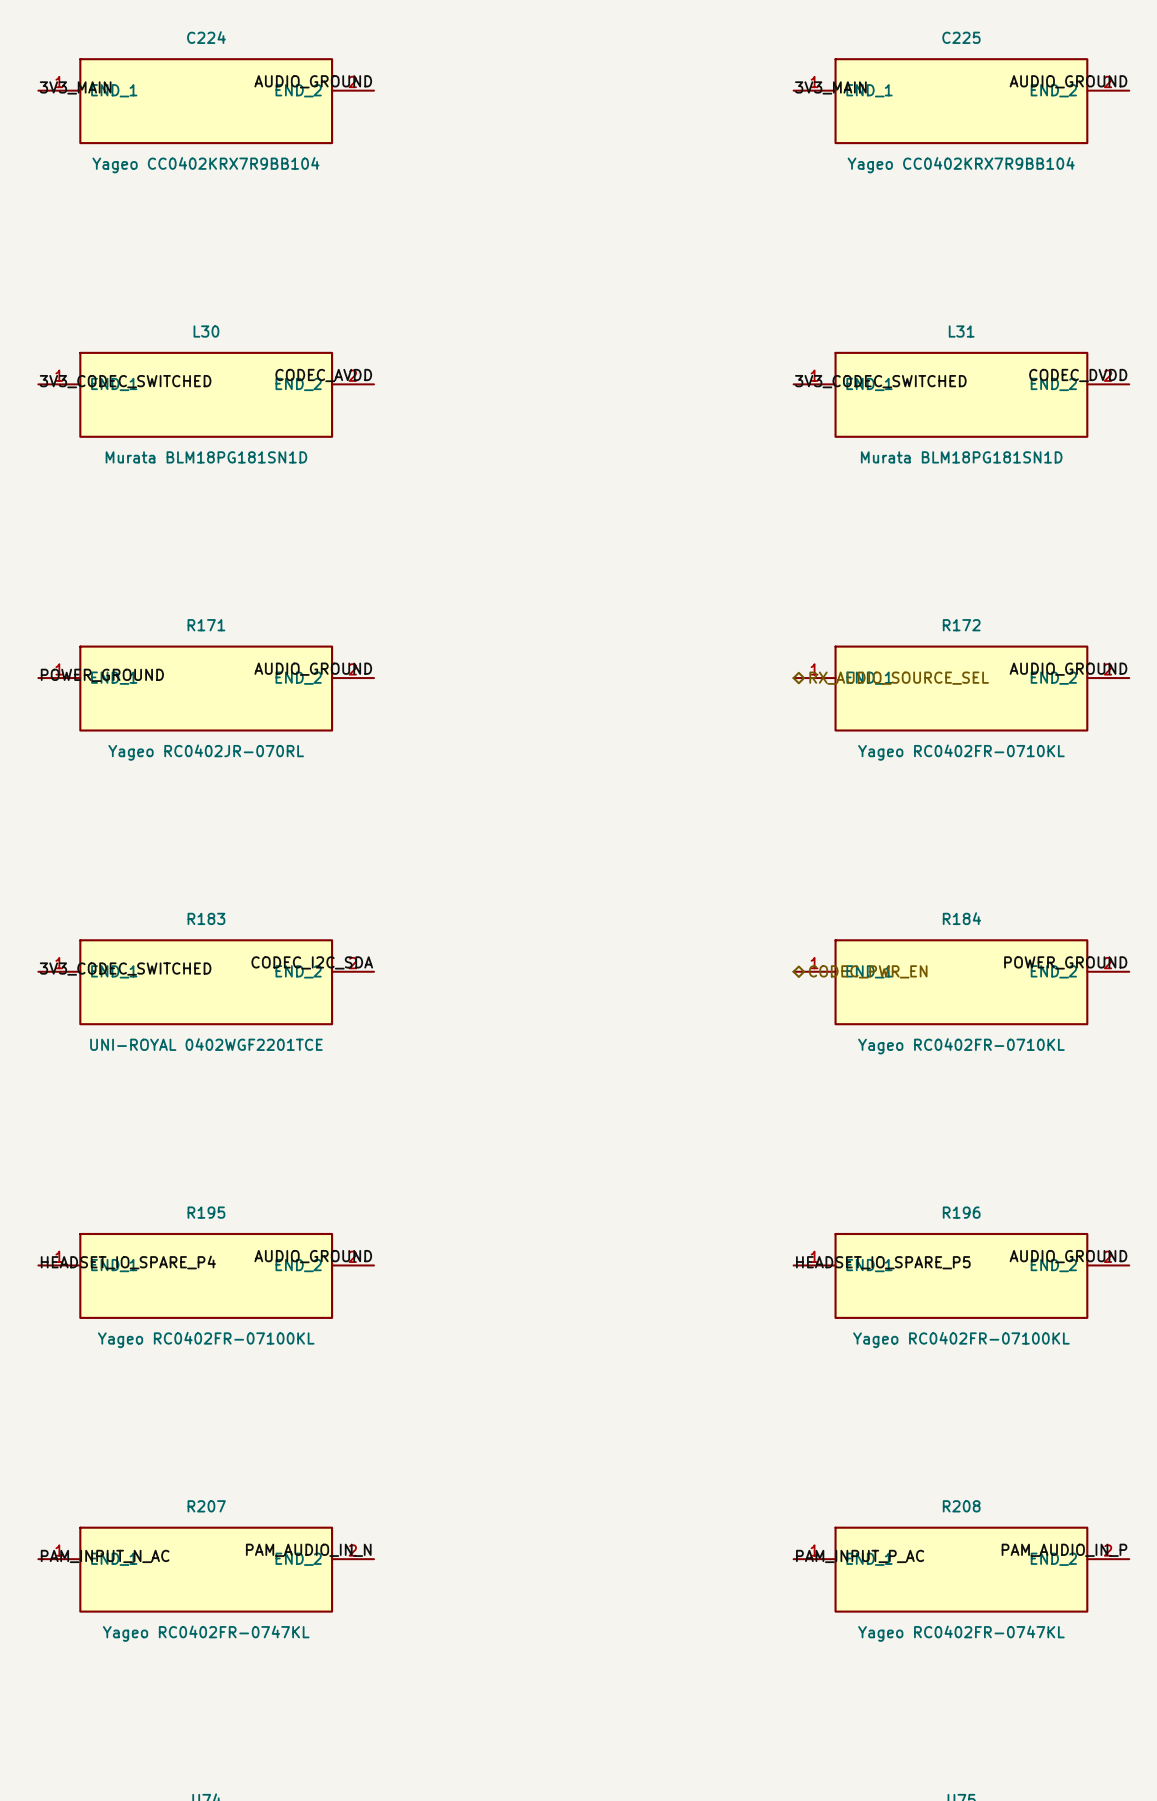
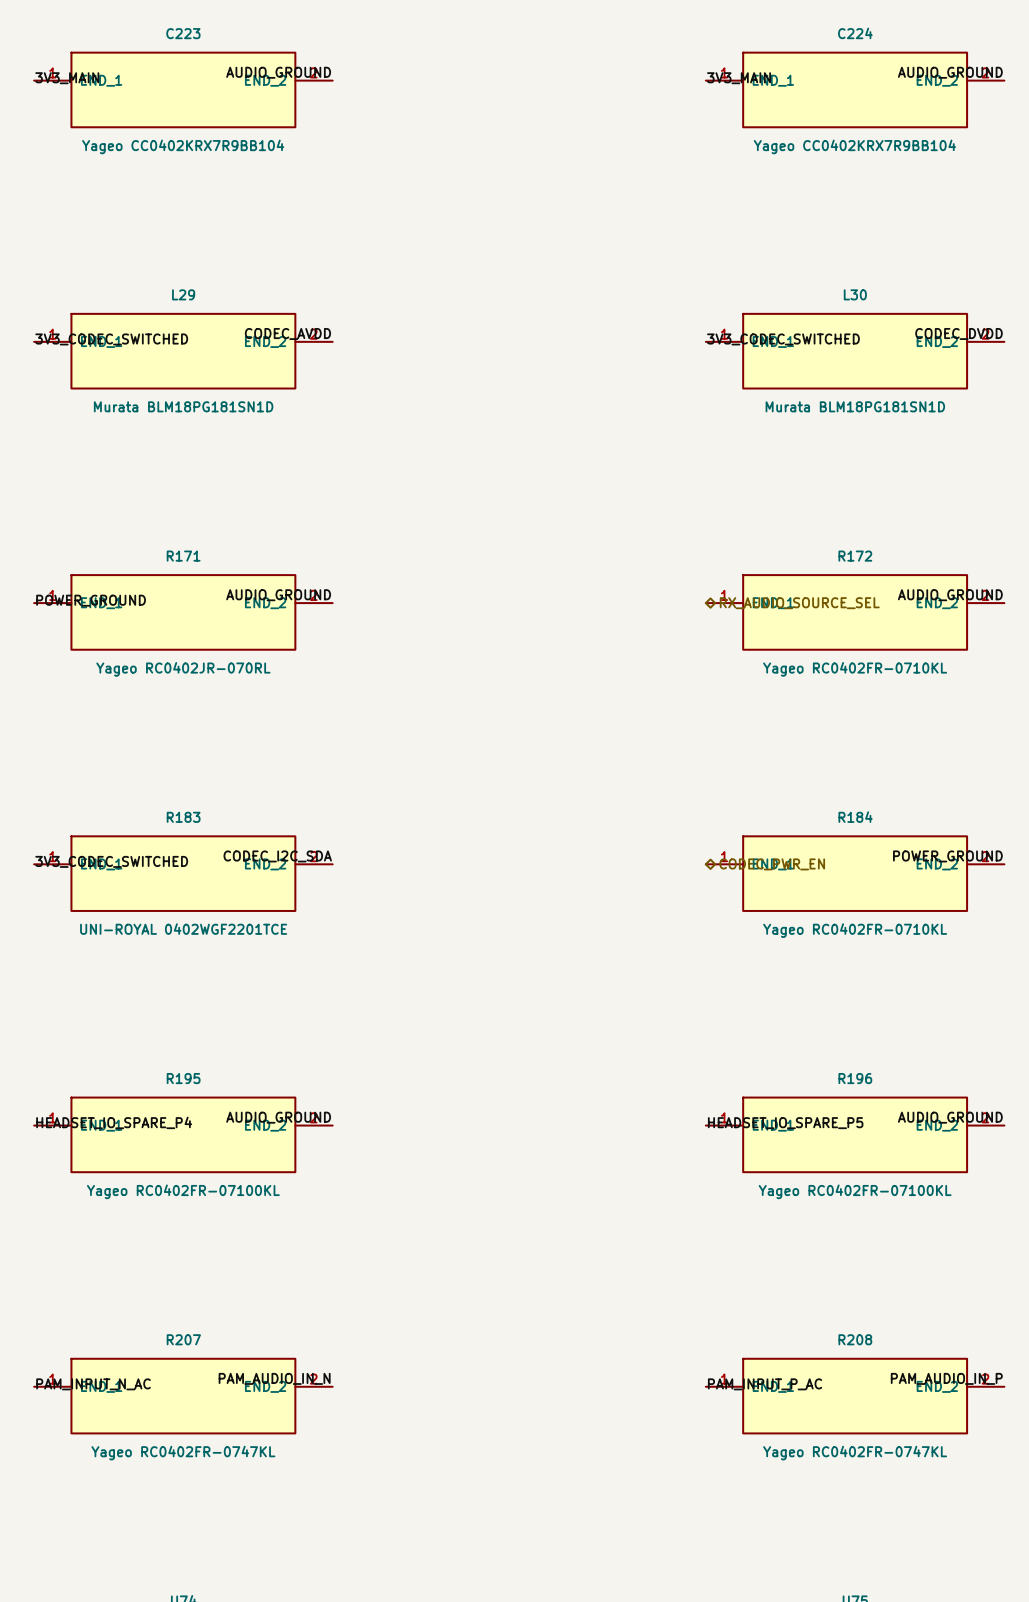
C224 name: C224 (206, 37) -> C223 (183, 33)
C225 name: C225 (961, 37) -> C224 (855, 33)
L30 name: L30 (206, 331) -> L29 (183, 294)
L31 name: L31 (961, 331) -> L30 (855, 294)

